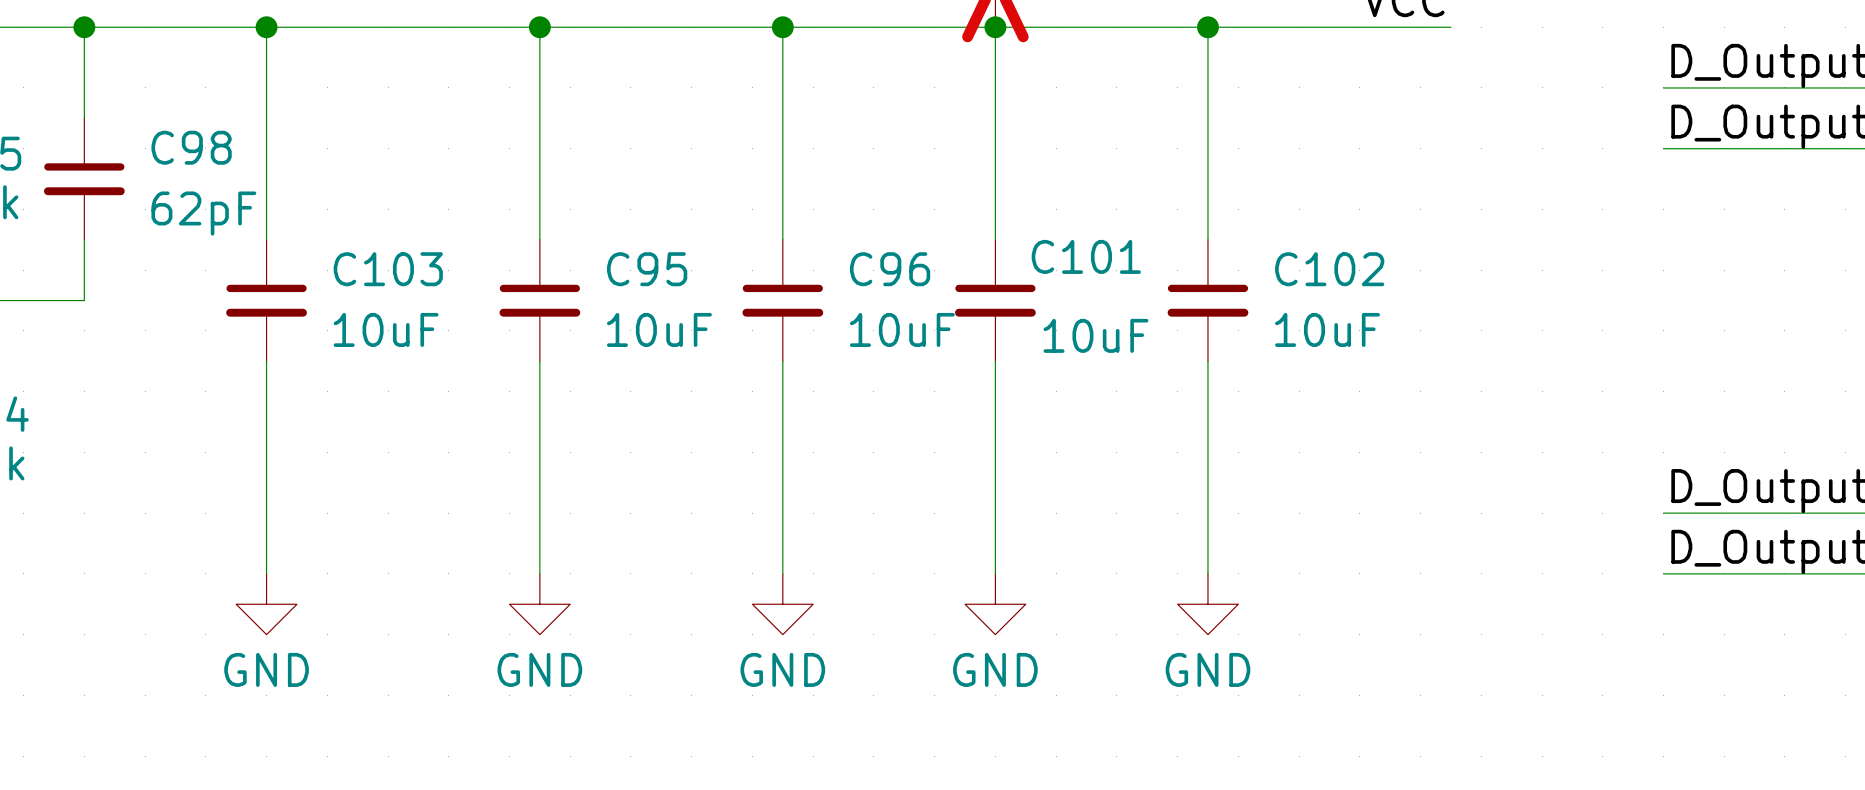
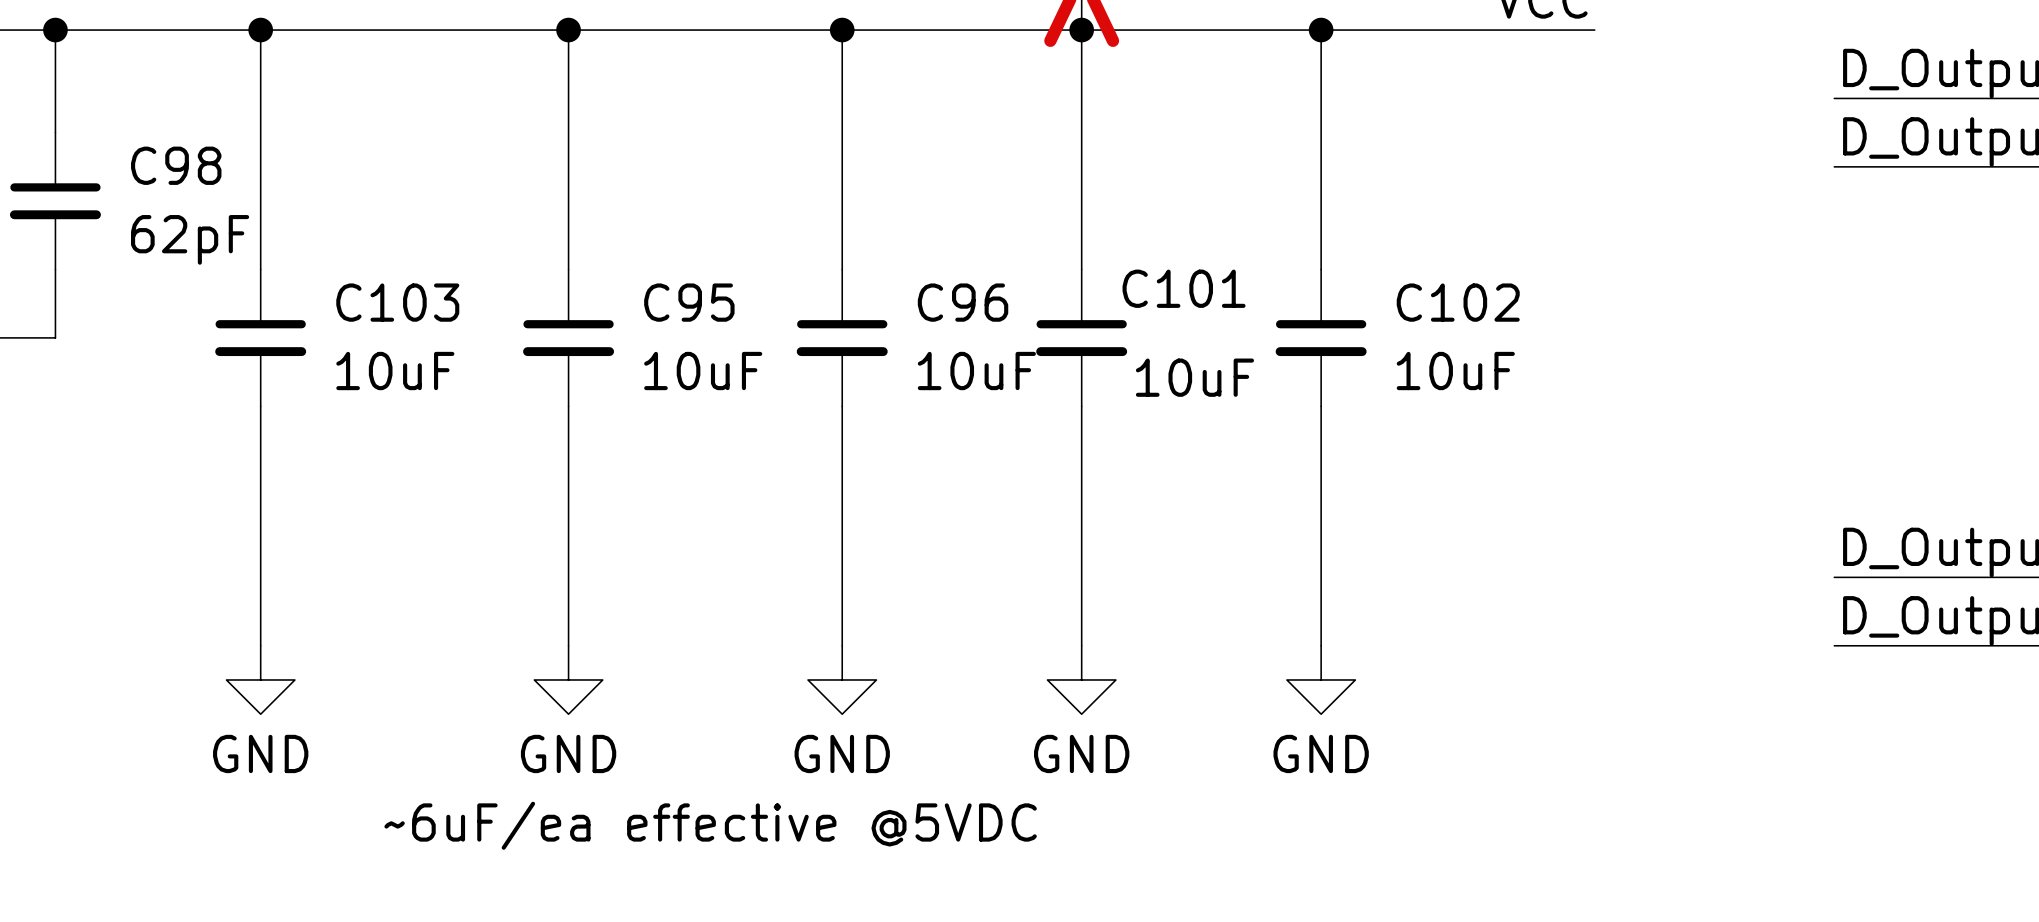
text: none -> ~6uF/ea effective @5VDC (710, 825)

